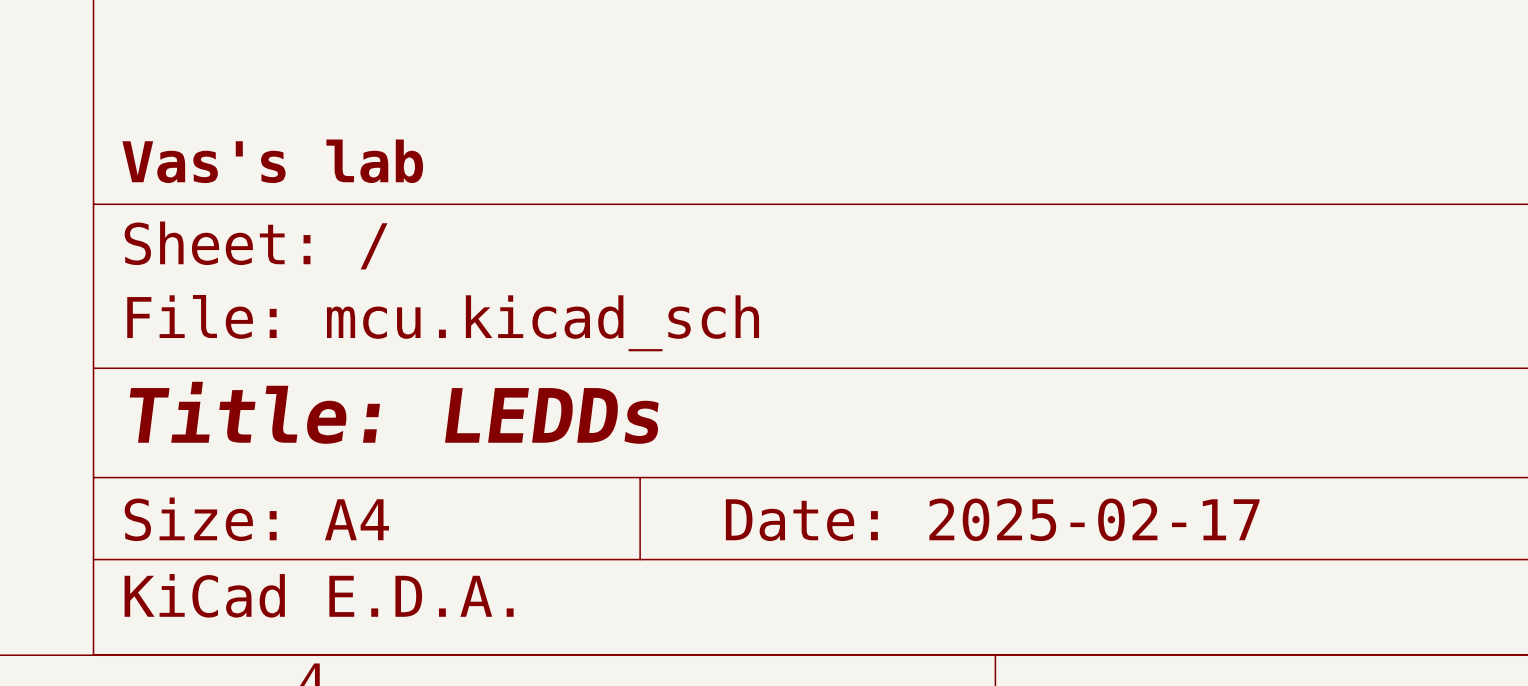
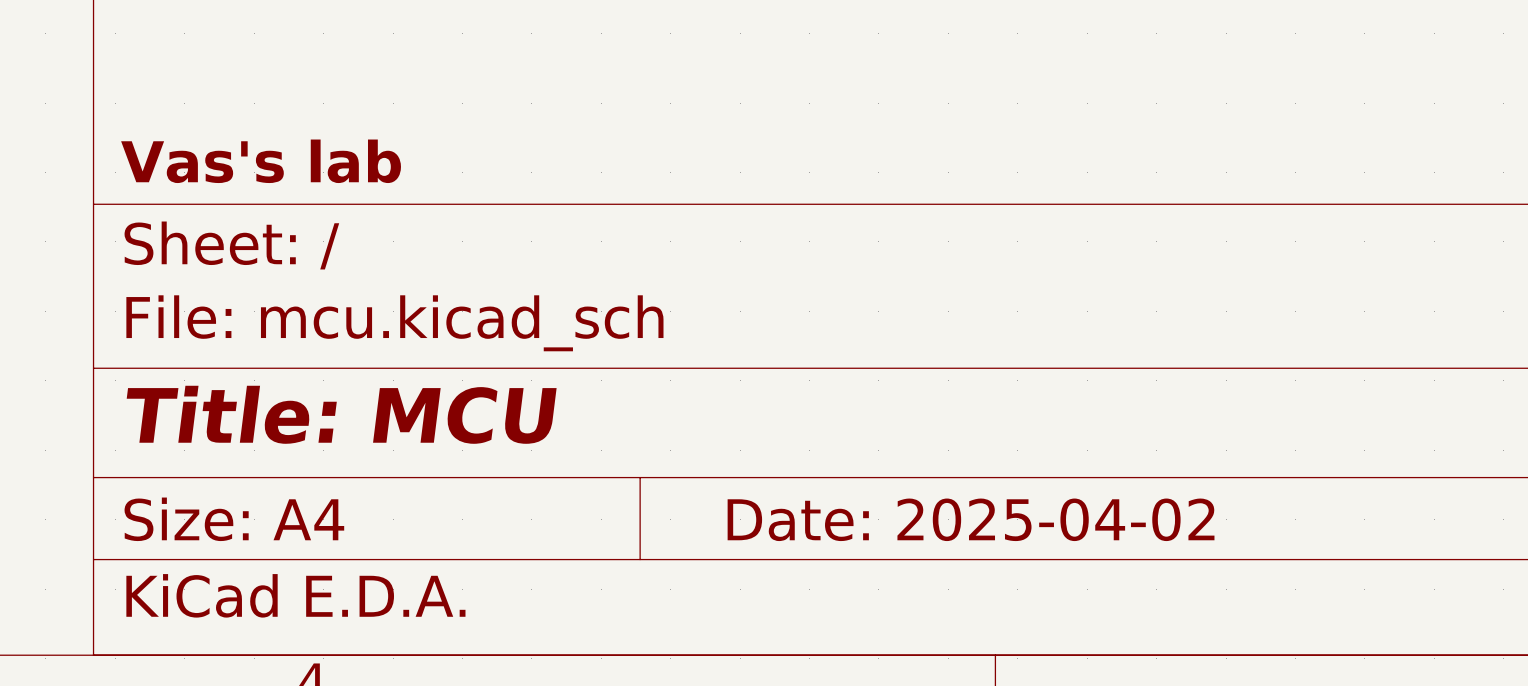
title block: Title: LEDDs (394, 412) -> Title: MCU (341, 414)
title block: Date: 2025-02-17 (992, 519) -> Date: 2025-04-02 (971, 519)

